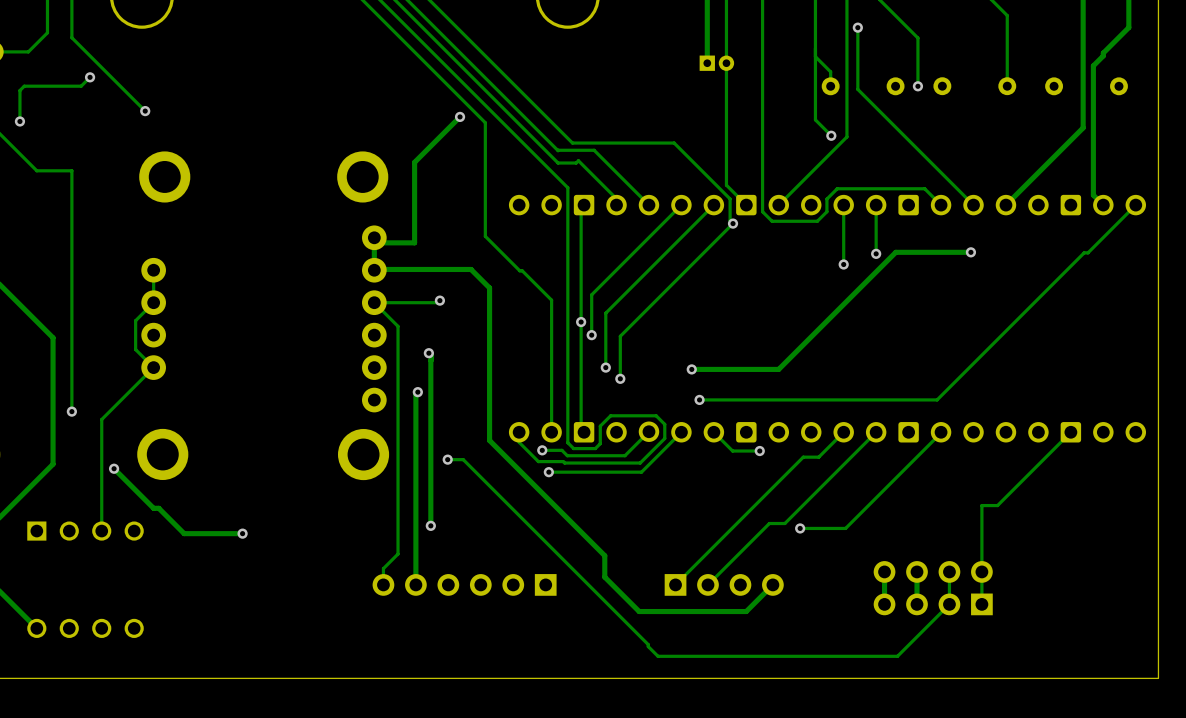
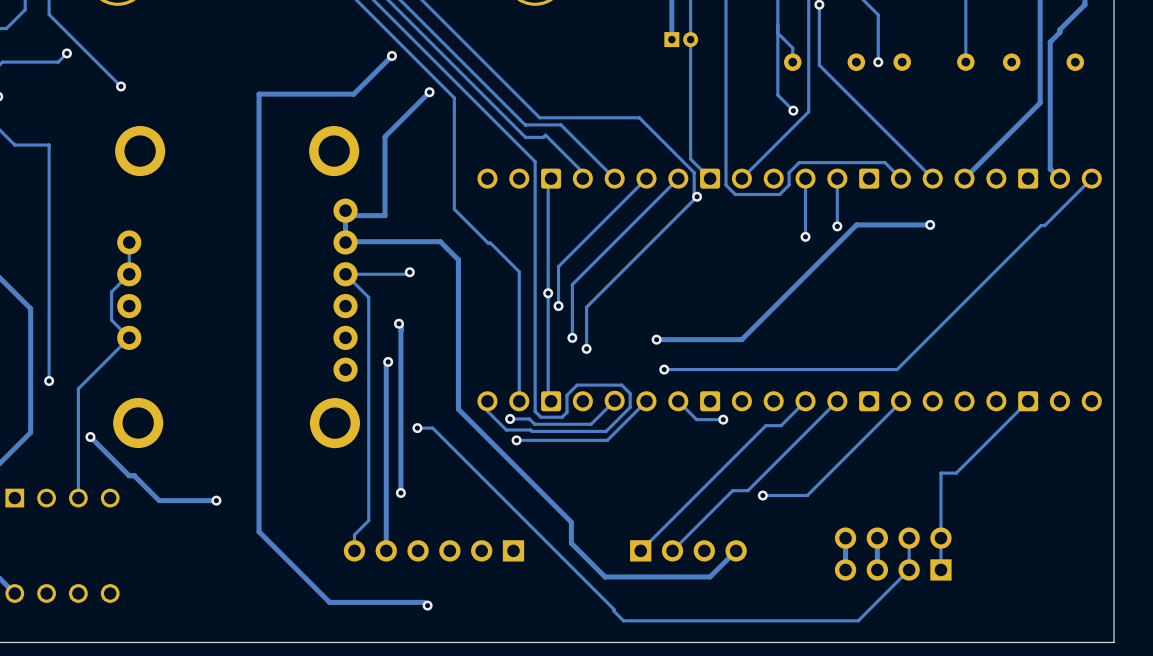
track: none -> (391, 55) (353, 94) (259, 94) (259, 531) (329, 602) (424, 602) (427, 605)
via: none -> (391, 55)
via: none -> (427, 605)

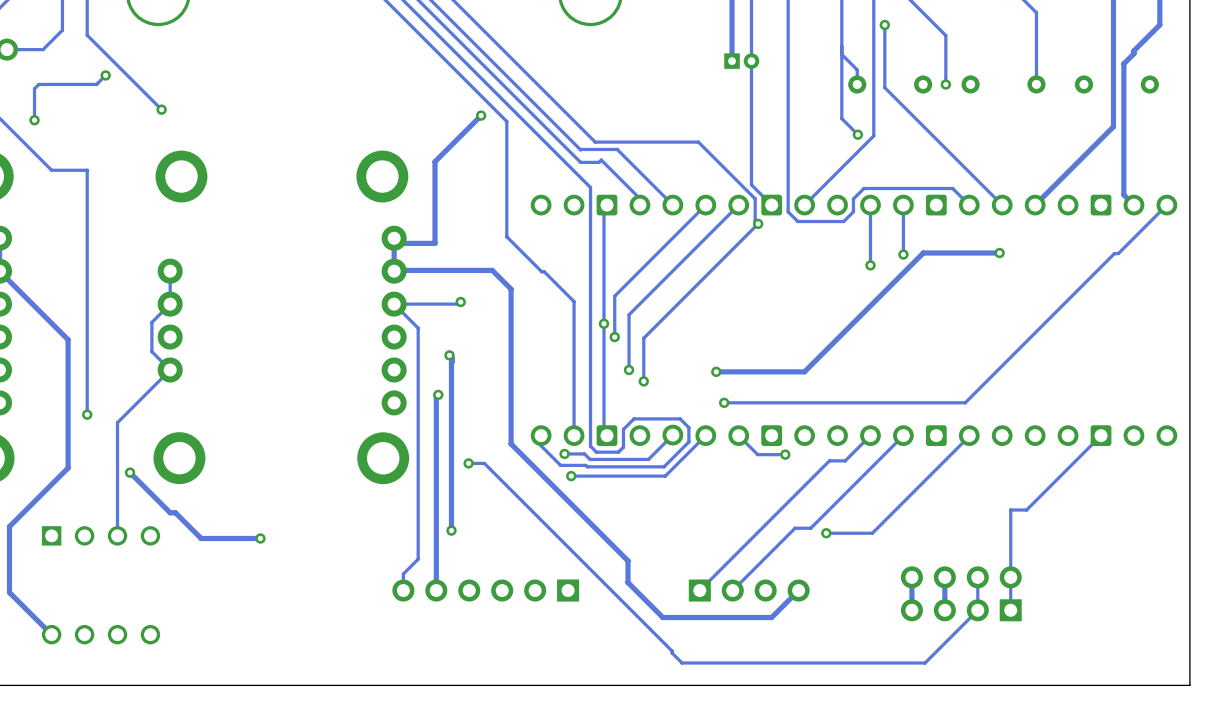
track: (391, 55) (353, 94) (259, 94) (259, 531) (329, 602) (424, 602) (427, 605) -> none
via: (391, 55) -> none
via: (427, 605) -> none

